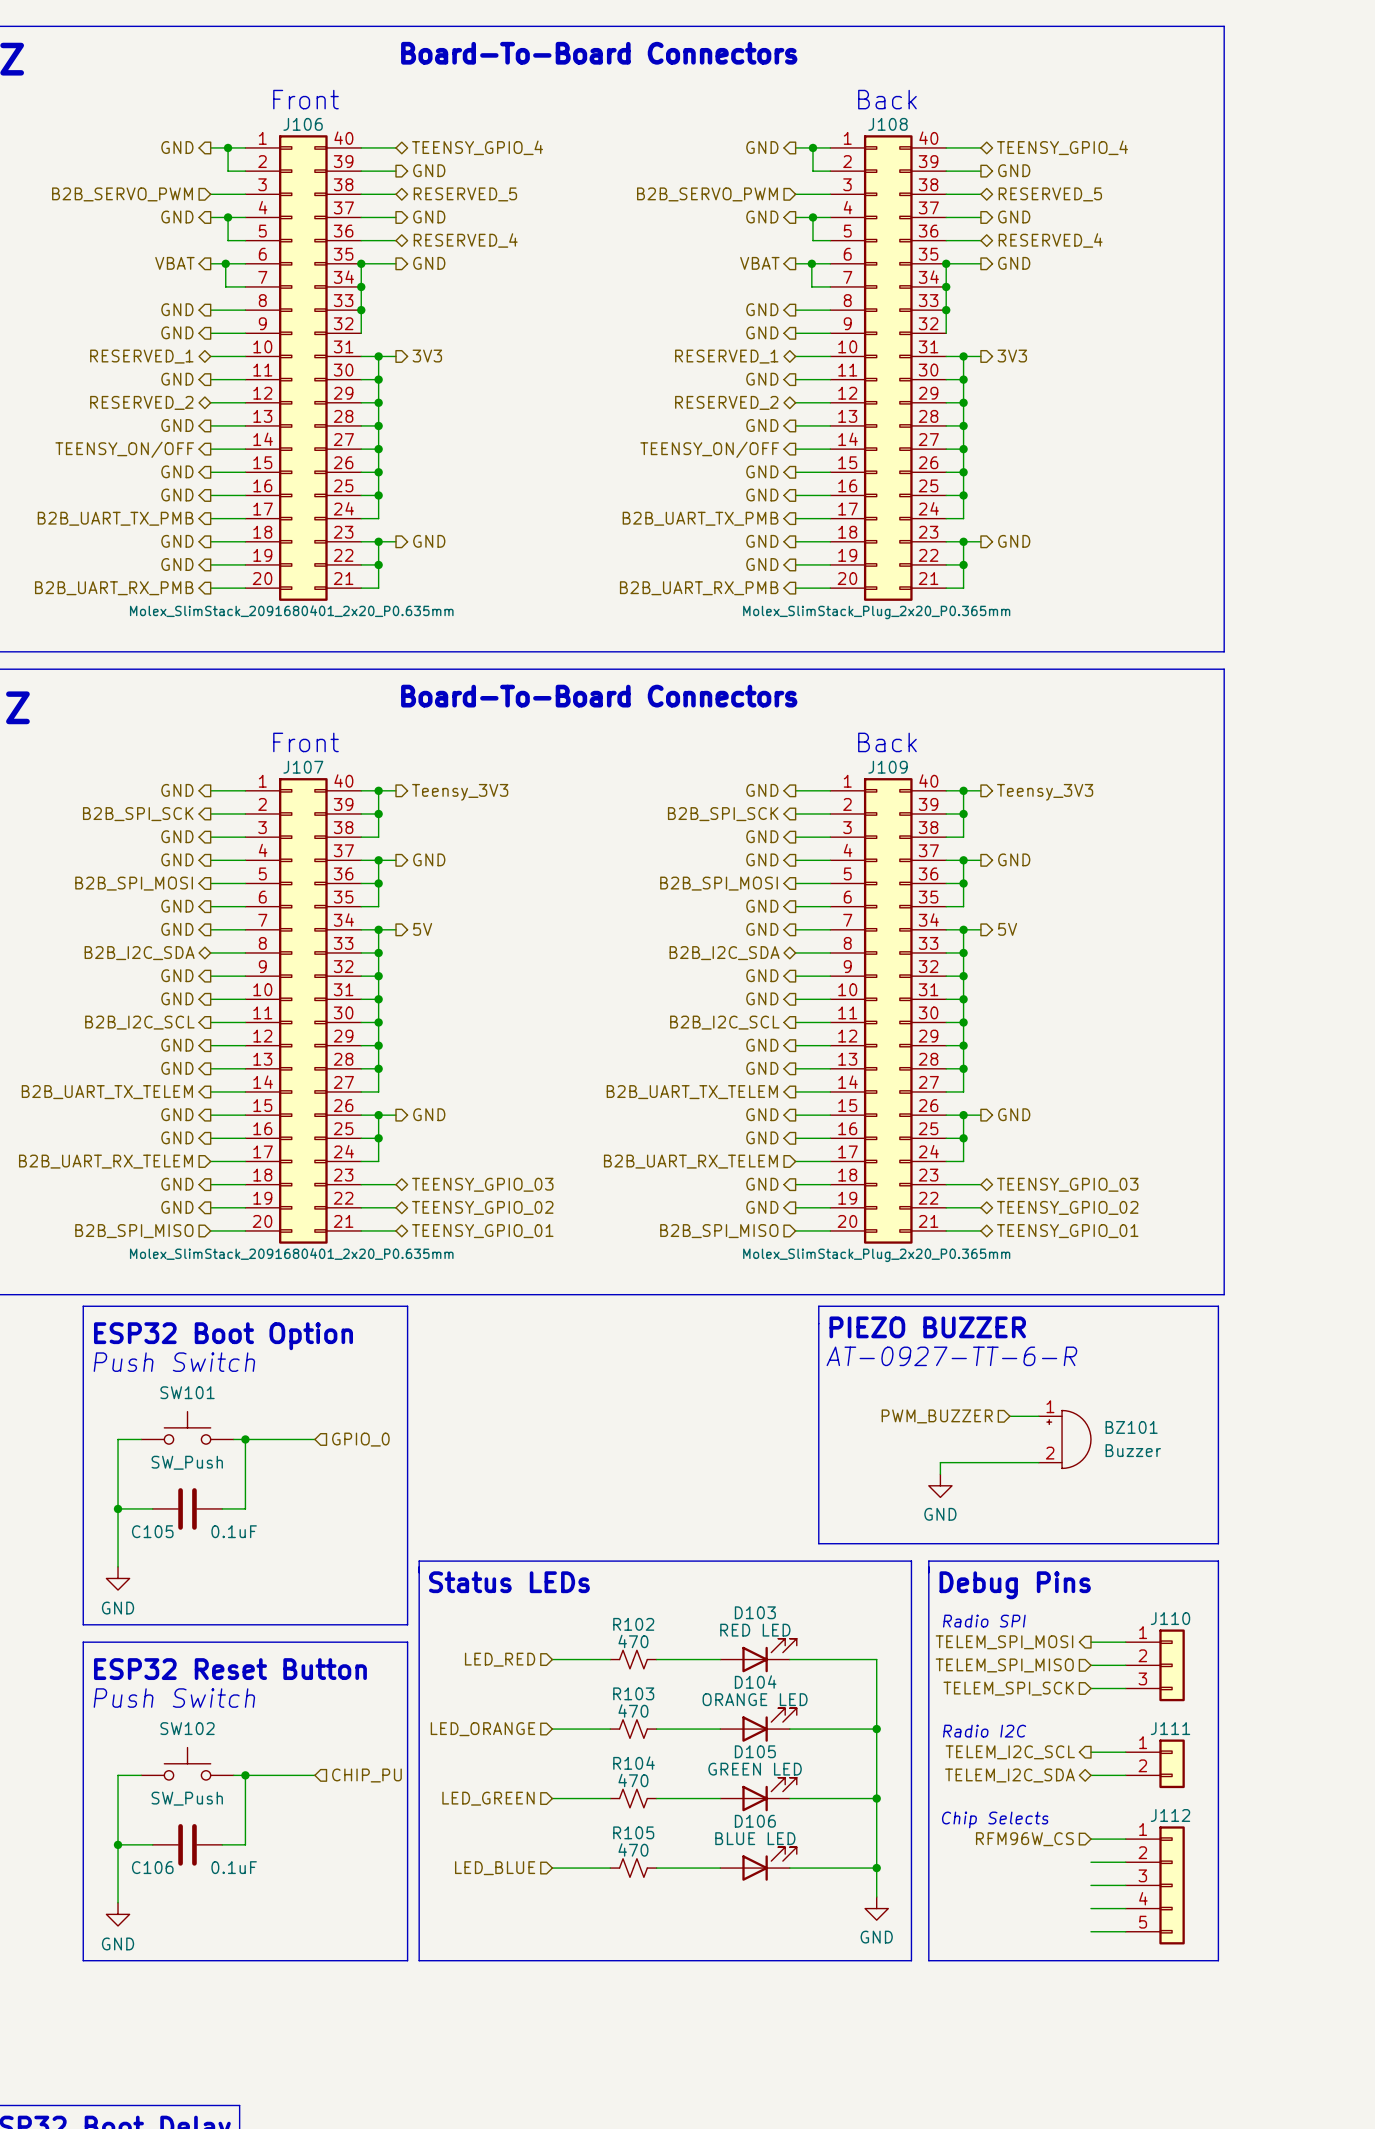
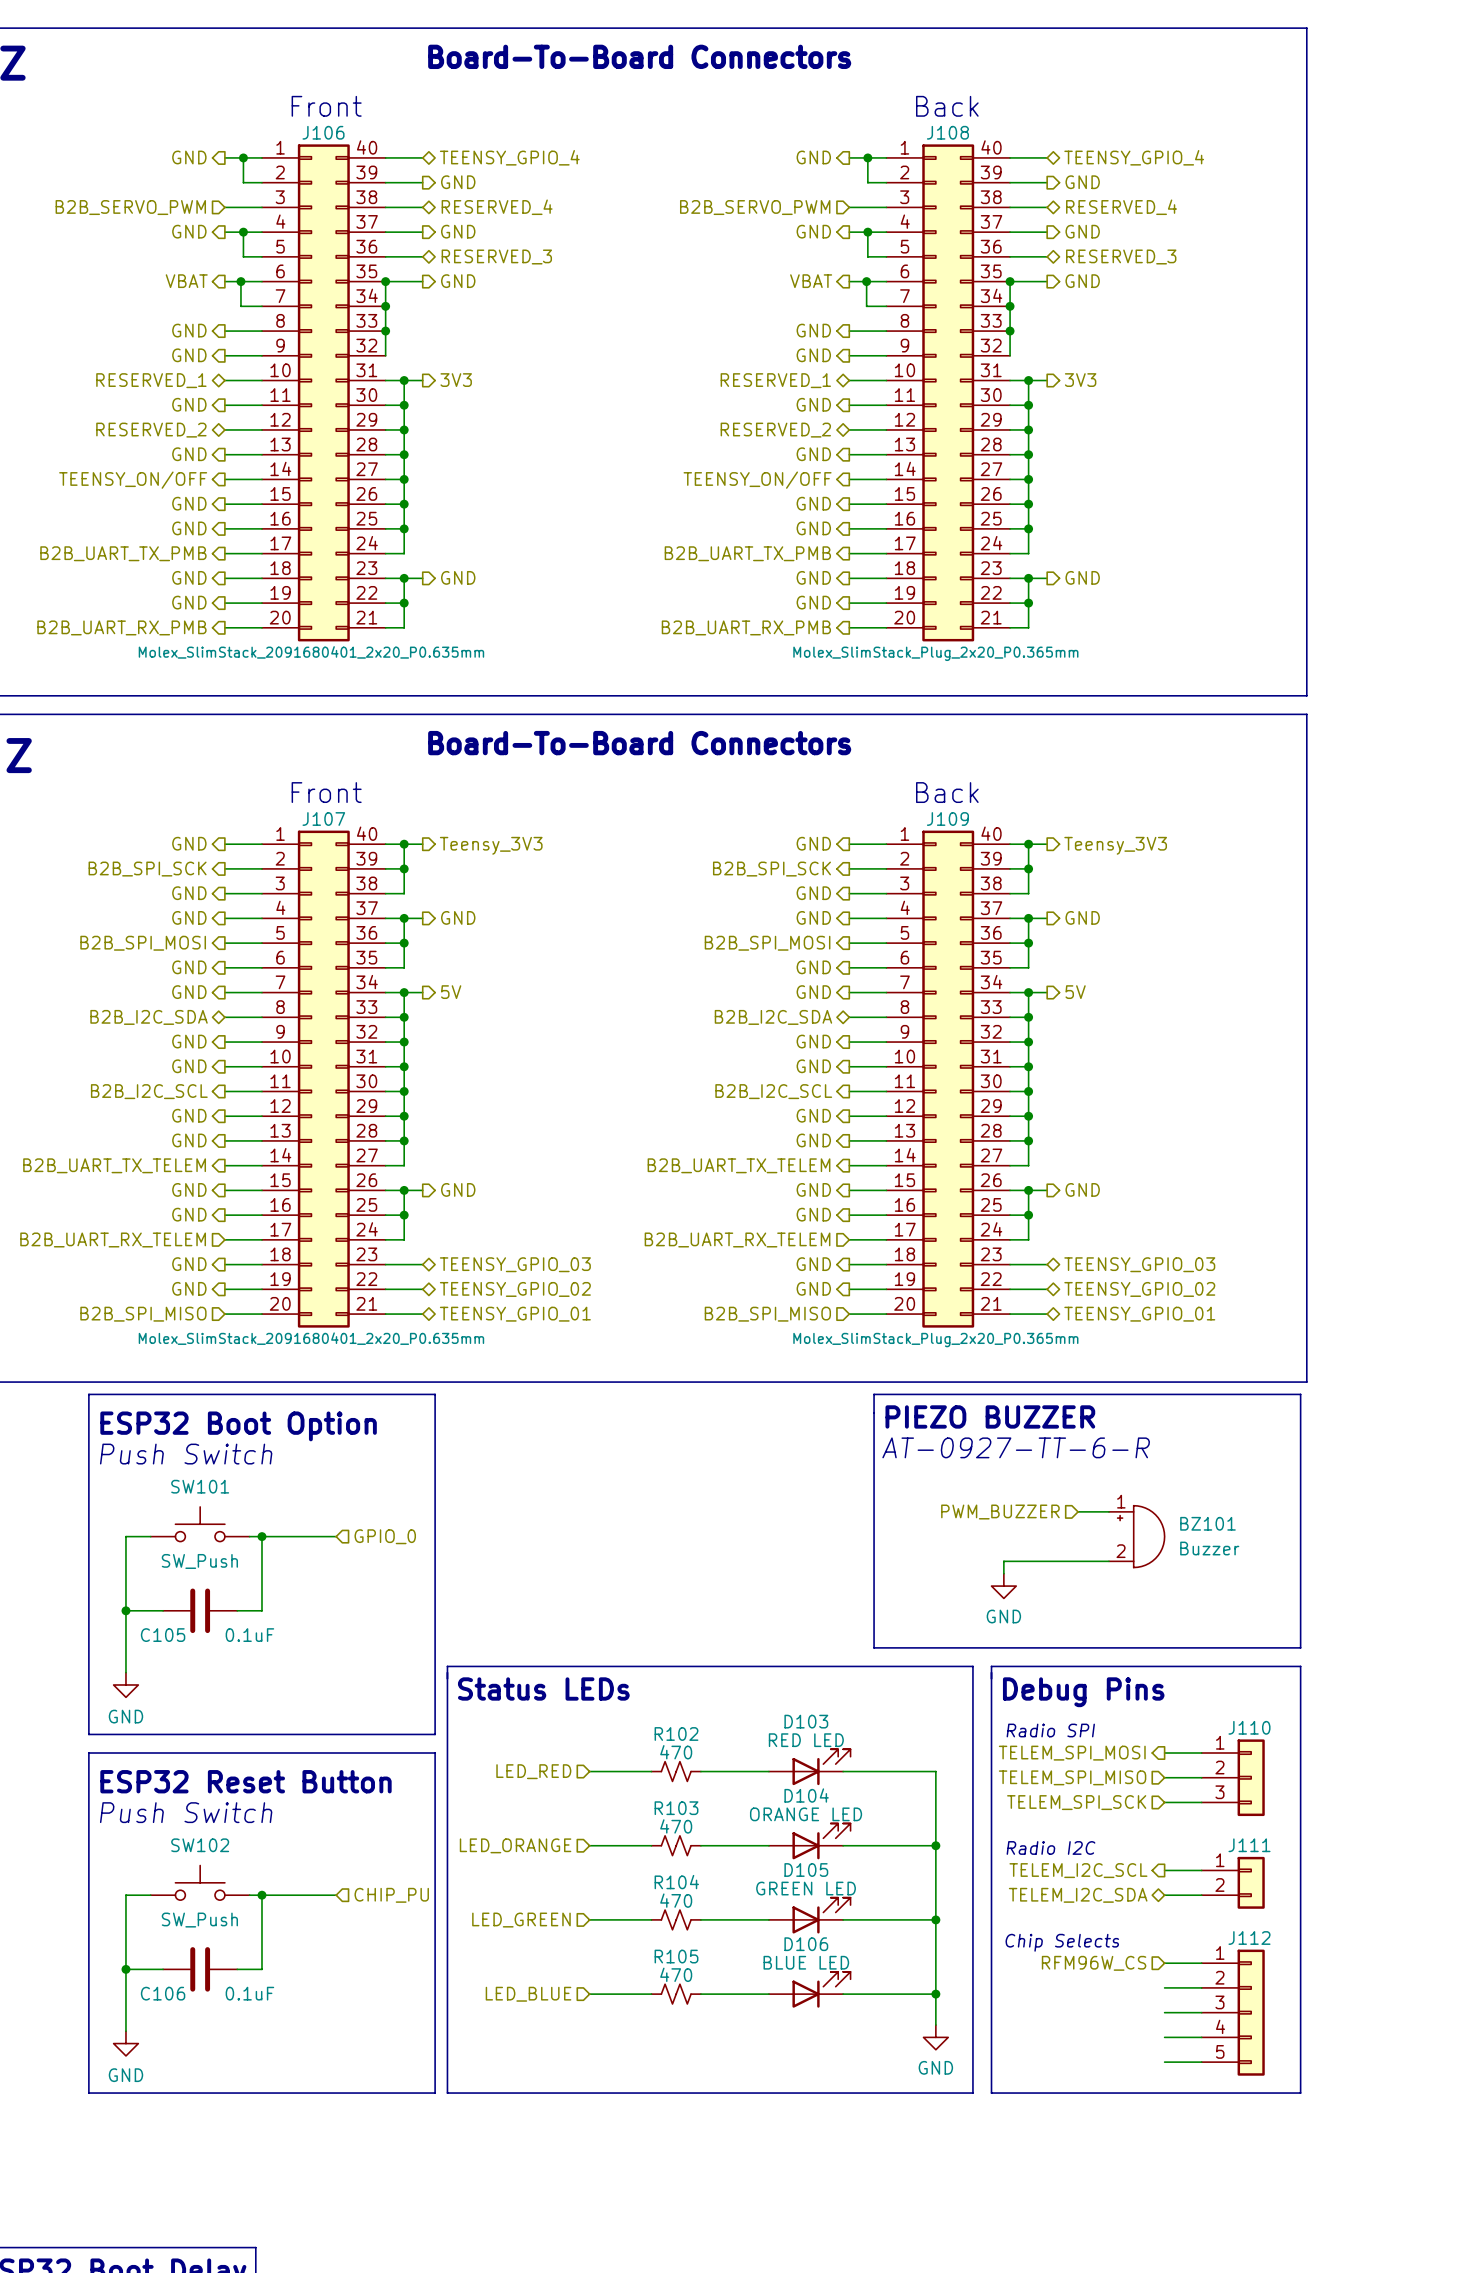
hierarchical label: RESERVED_5 (465, 194) -> RESERVED_4 (497, 207)
hierarchical label: RESERVED_5 (1050, 194) -> RESERVED_4 (1121, 207)
hierarchical label: RESERVED_4 (465, 240) -> RESERVED_3 (496, 257)
hierarchical label: RESERVED_4 (1050, 240) -> RESERVED_3 (1121, 257)

